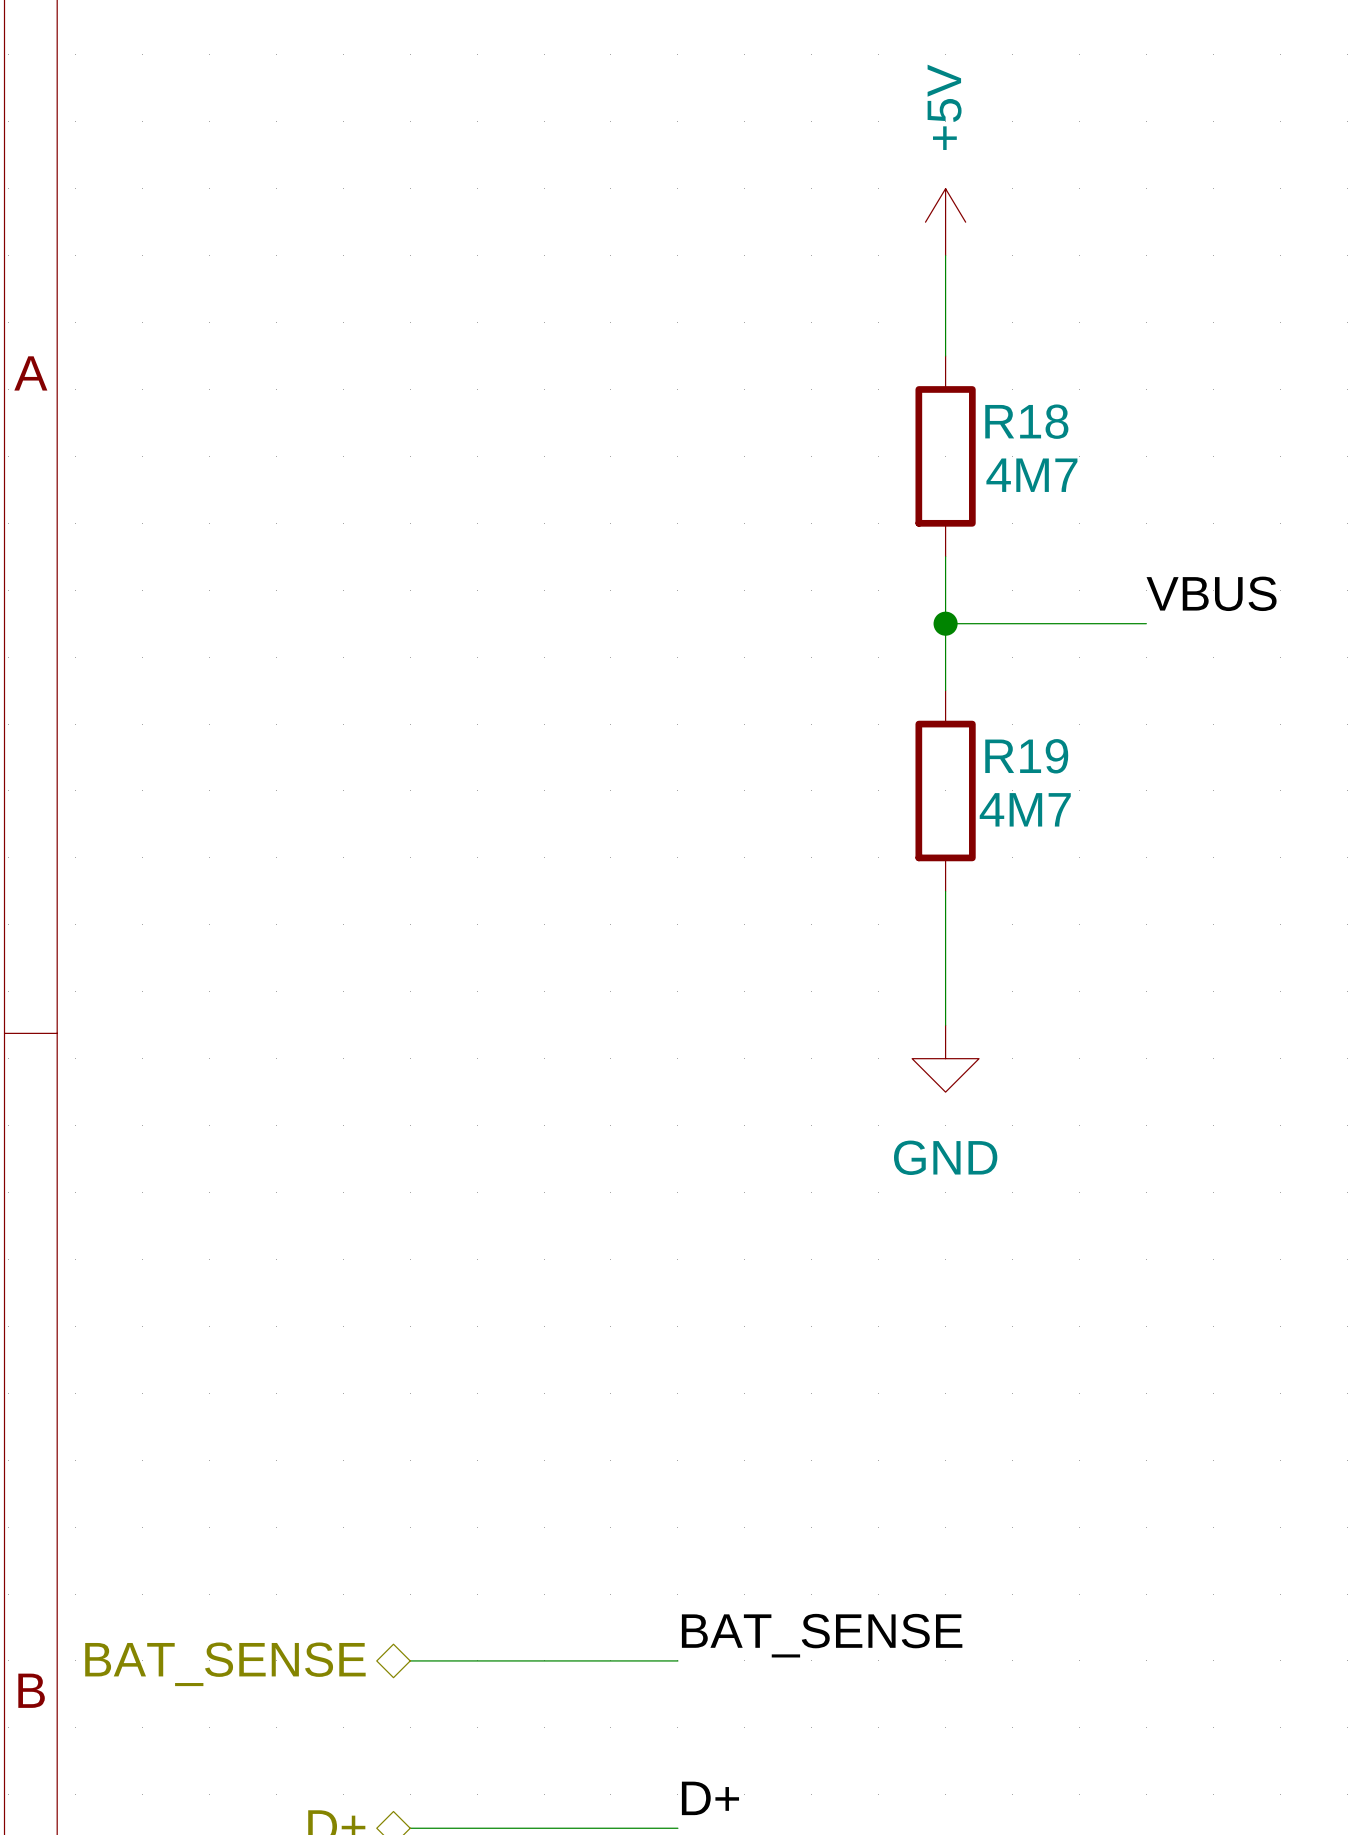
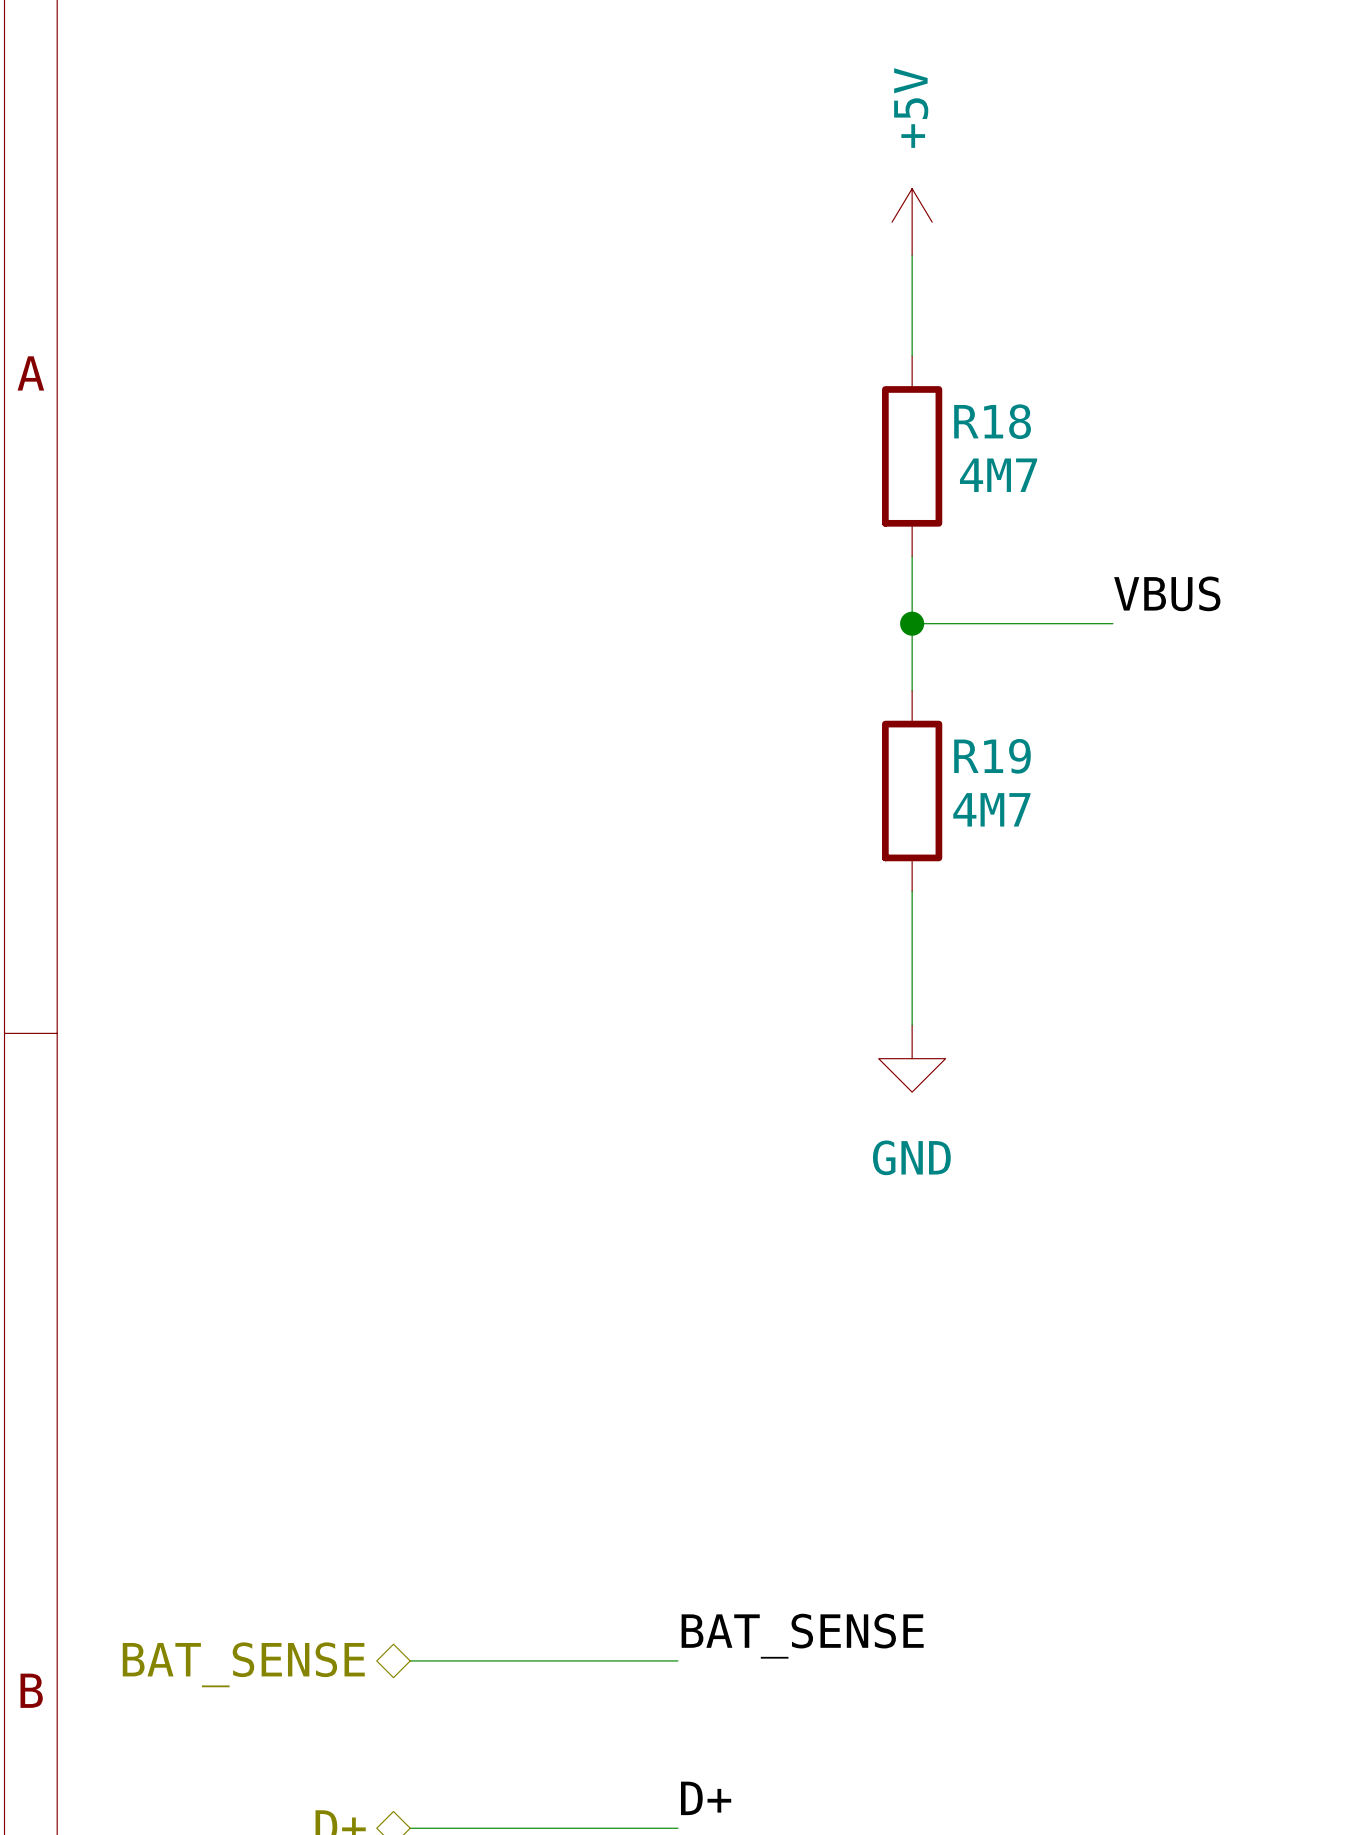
power symbol position: +5V (945, 222) -> +5V (912, 222)
wire: (945, 255) (945, 356) -> (912, 255) (912, 356)
R18 position: (945, 456) -> (912, 456)
wire: (945, 556) (945, 690) -> (912, 556) (912, 690)
label position: VBUS (1211, 593) -> VBUS (1167, 593)
junction position: (945, 623) -> (912, 623)
wire: (1112, 623) (1146, 623) -> (912, 623) (945, 623)
R19 position: (945, 790) -> (912, 790)
wire: (945, 891) (945, 1025) -> (912, 891) (912, 1025)
power symbol position: GND (945, 1058) -> GND (912, 1058)

